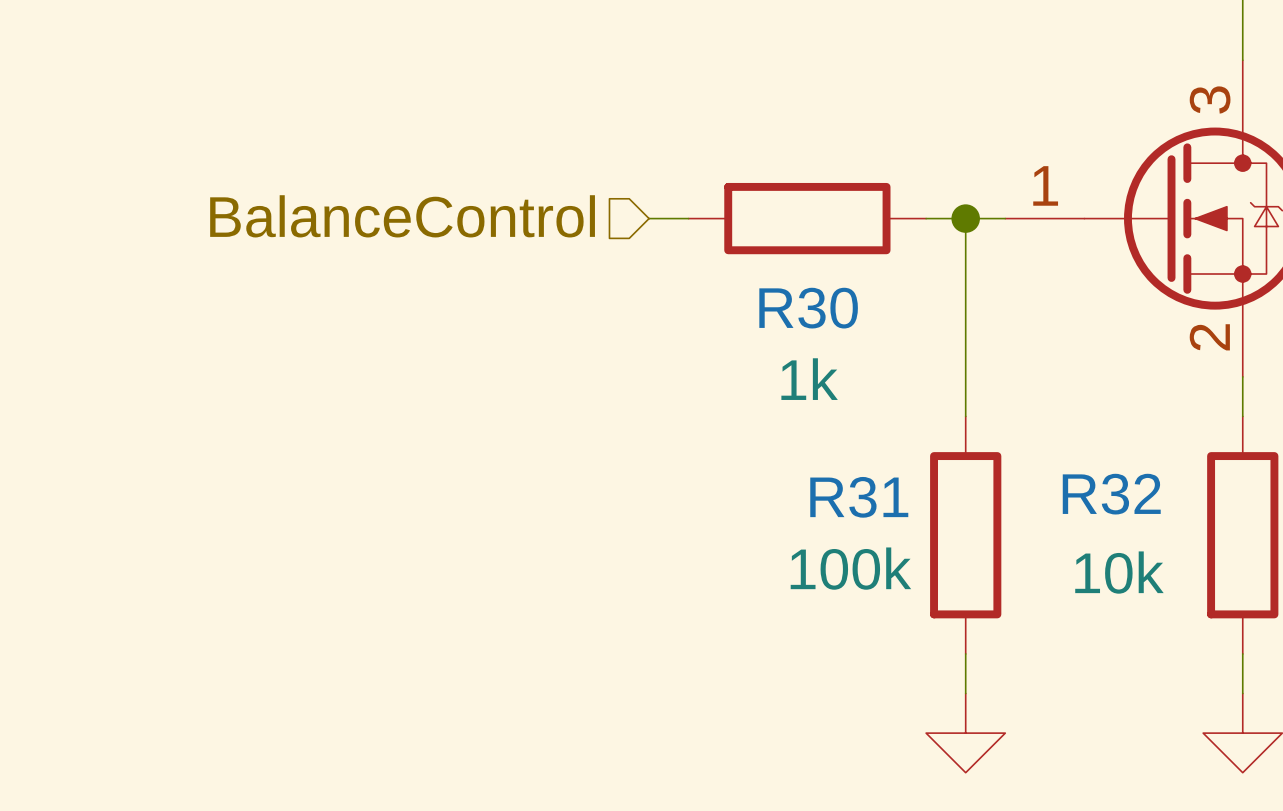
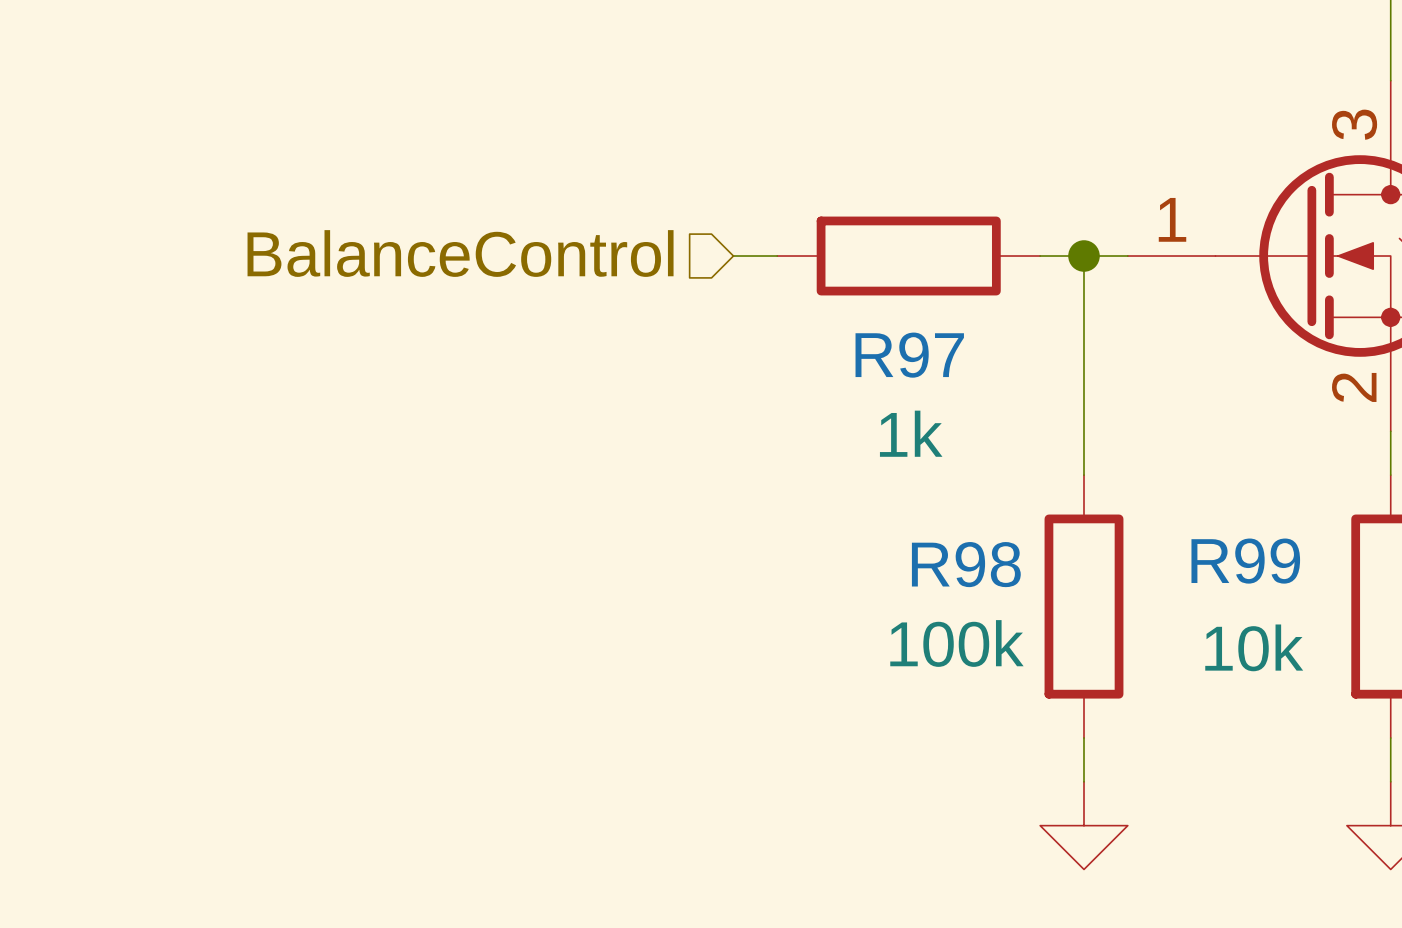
R30 name: R30 (808, 308) -> R97 (909, 355)
R32 name: R32 (1111, 494) -> R99 (1245, 561)
R31 name: R31 (859, 497) -> R98 (966, 564)

